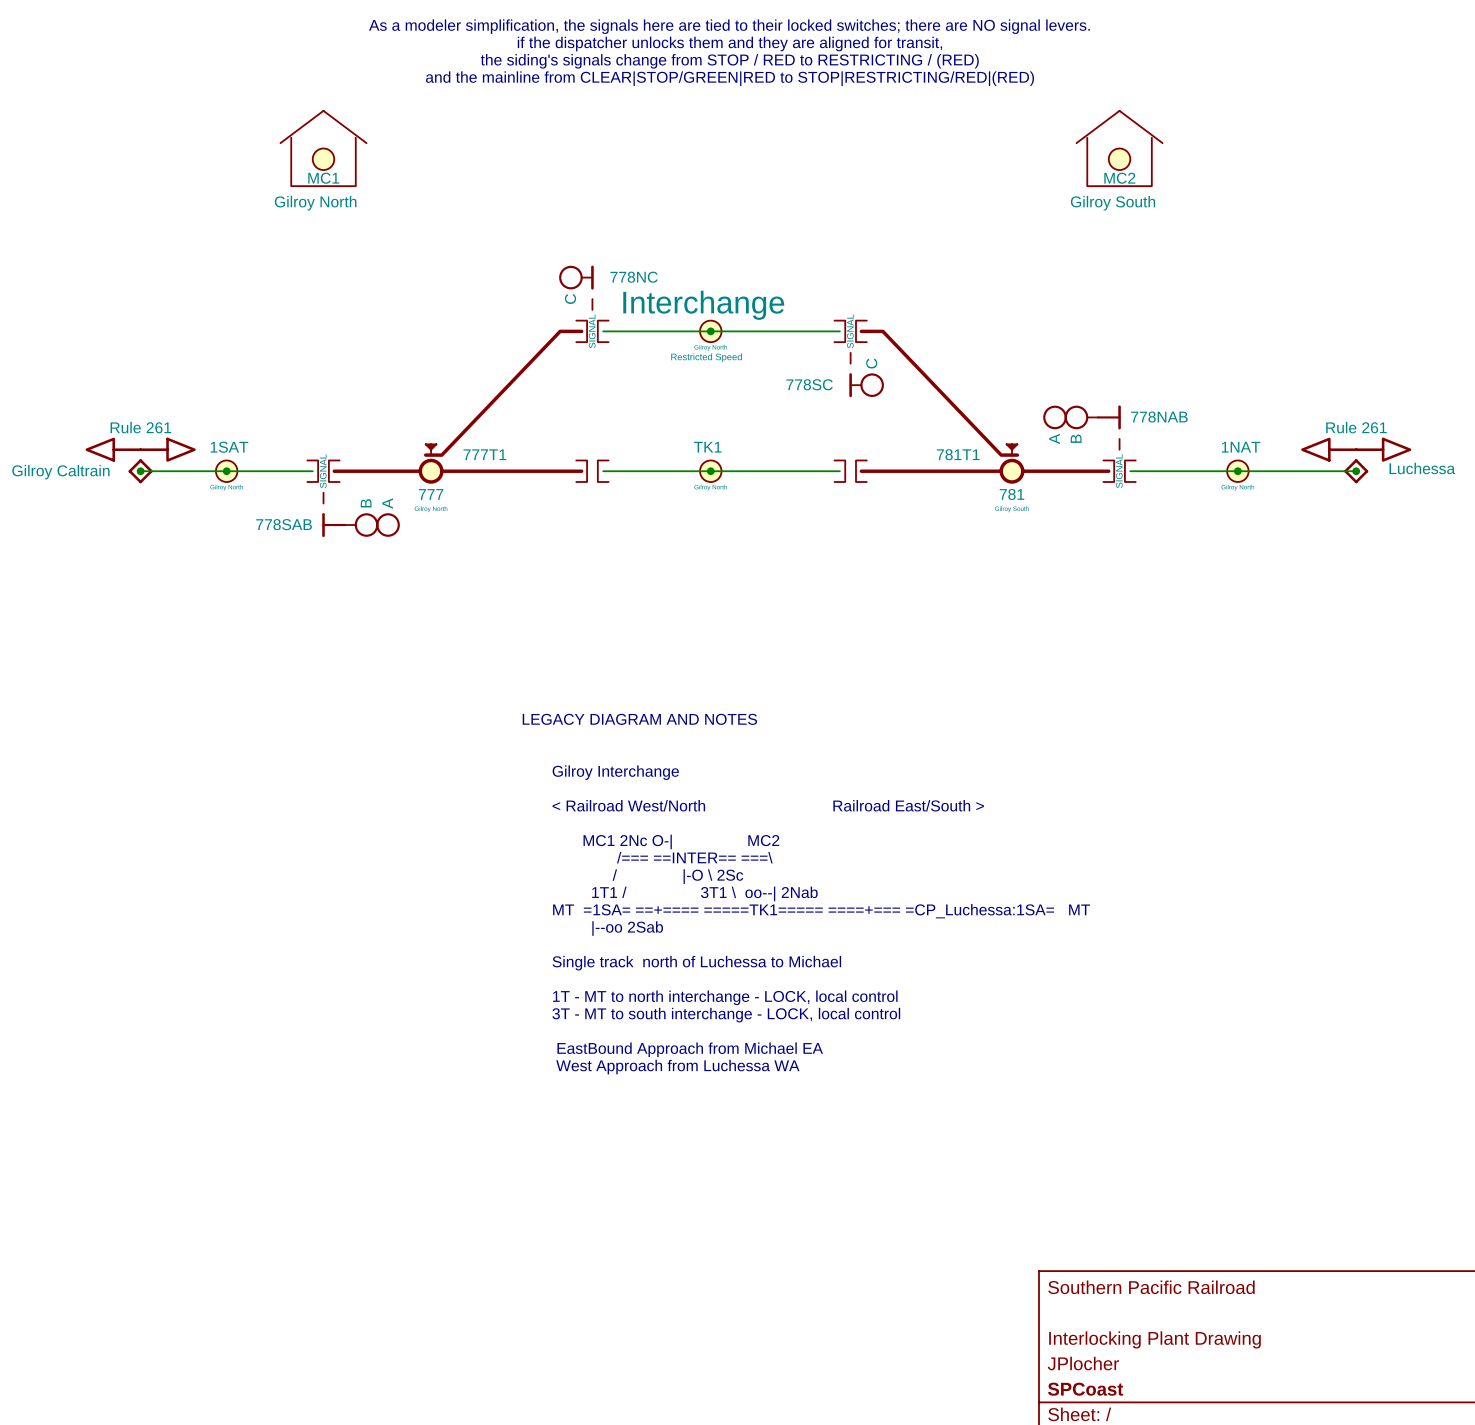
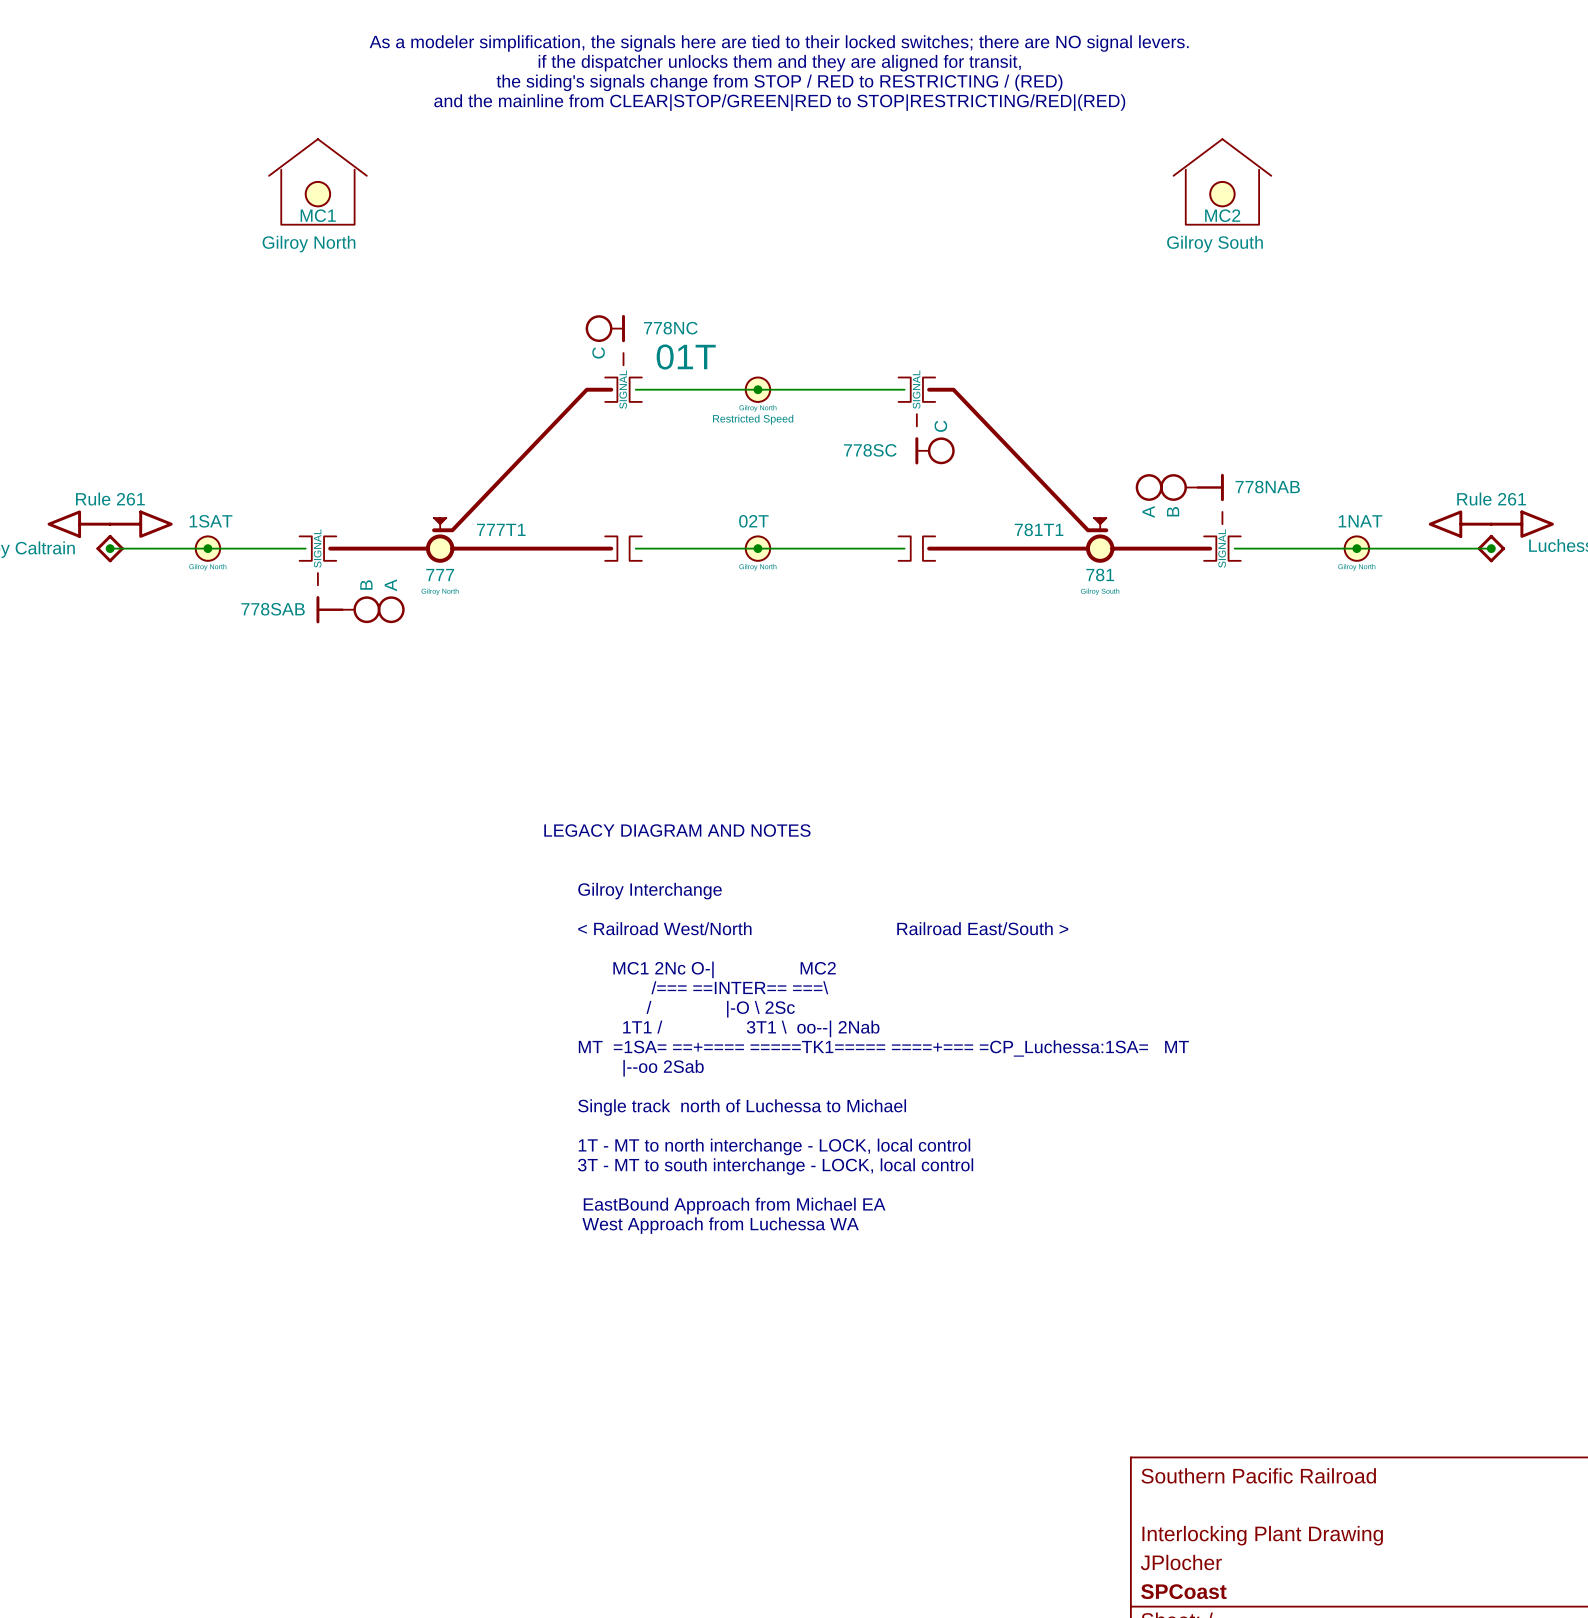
part value: Interchange (703, 305) -> 01T (686, 357)
part value: TK1 (707, 447) -> 02T (753, 521)

